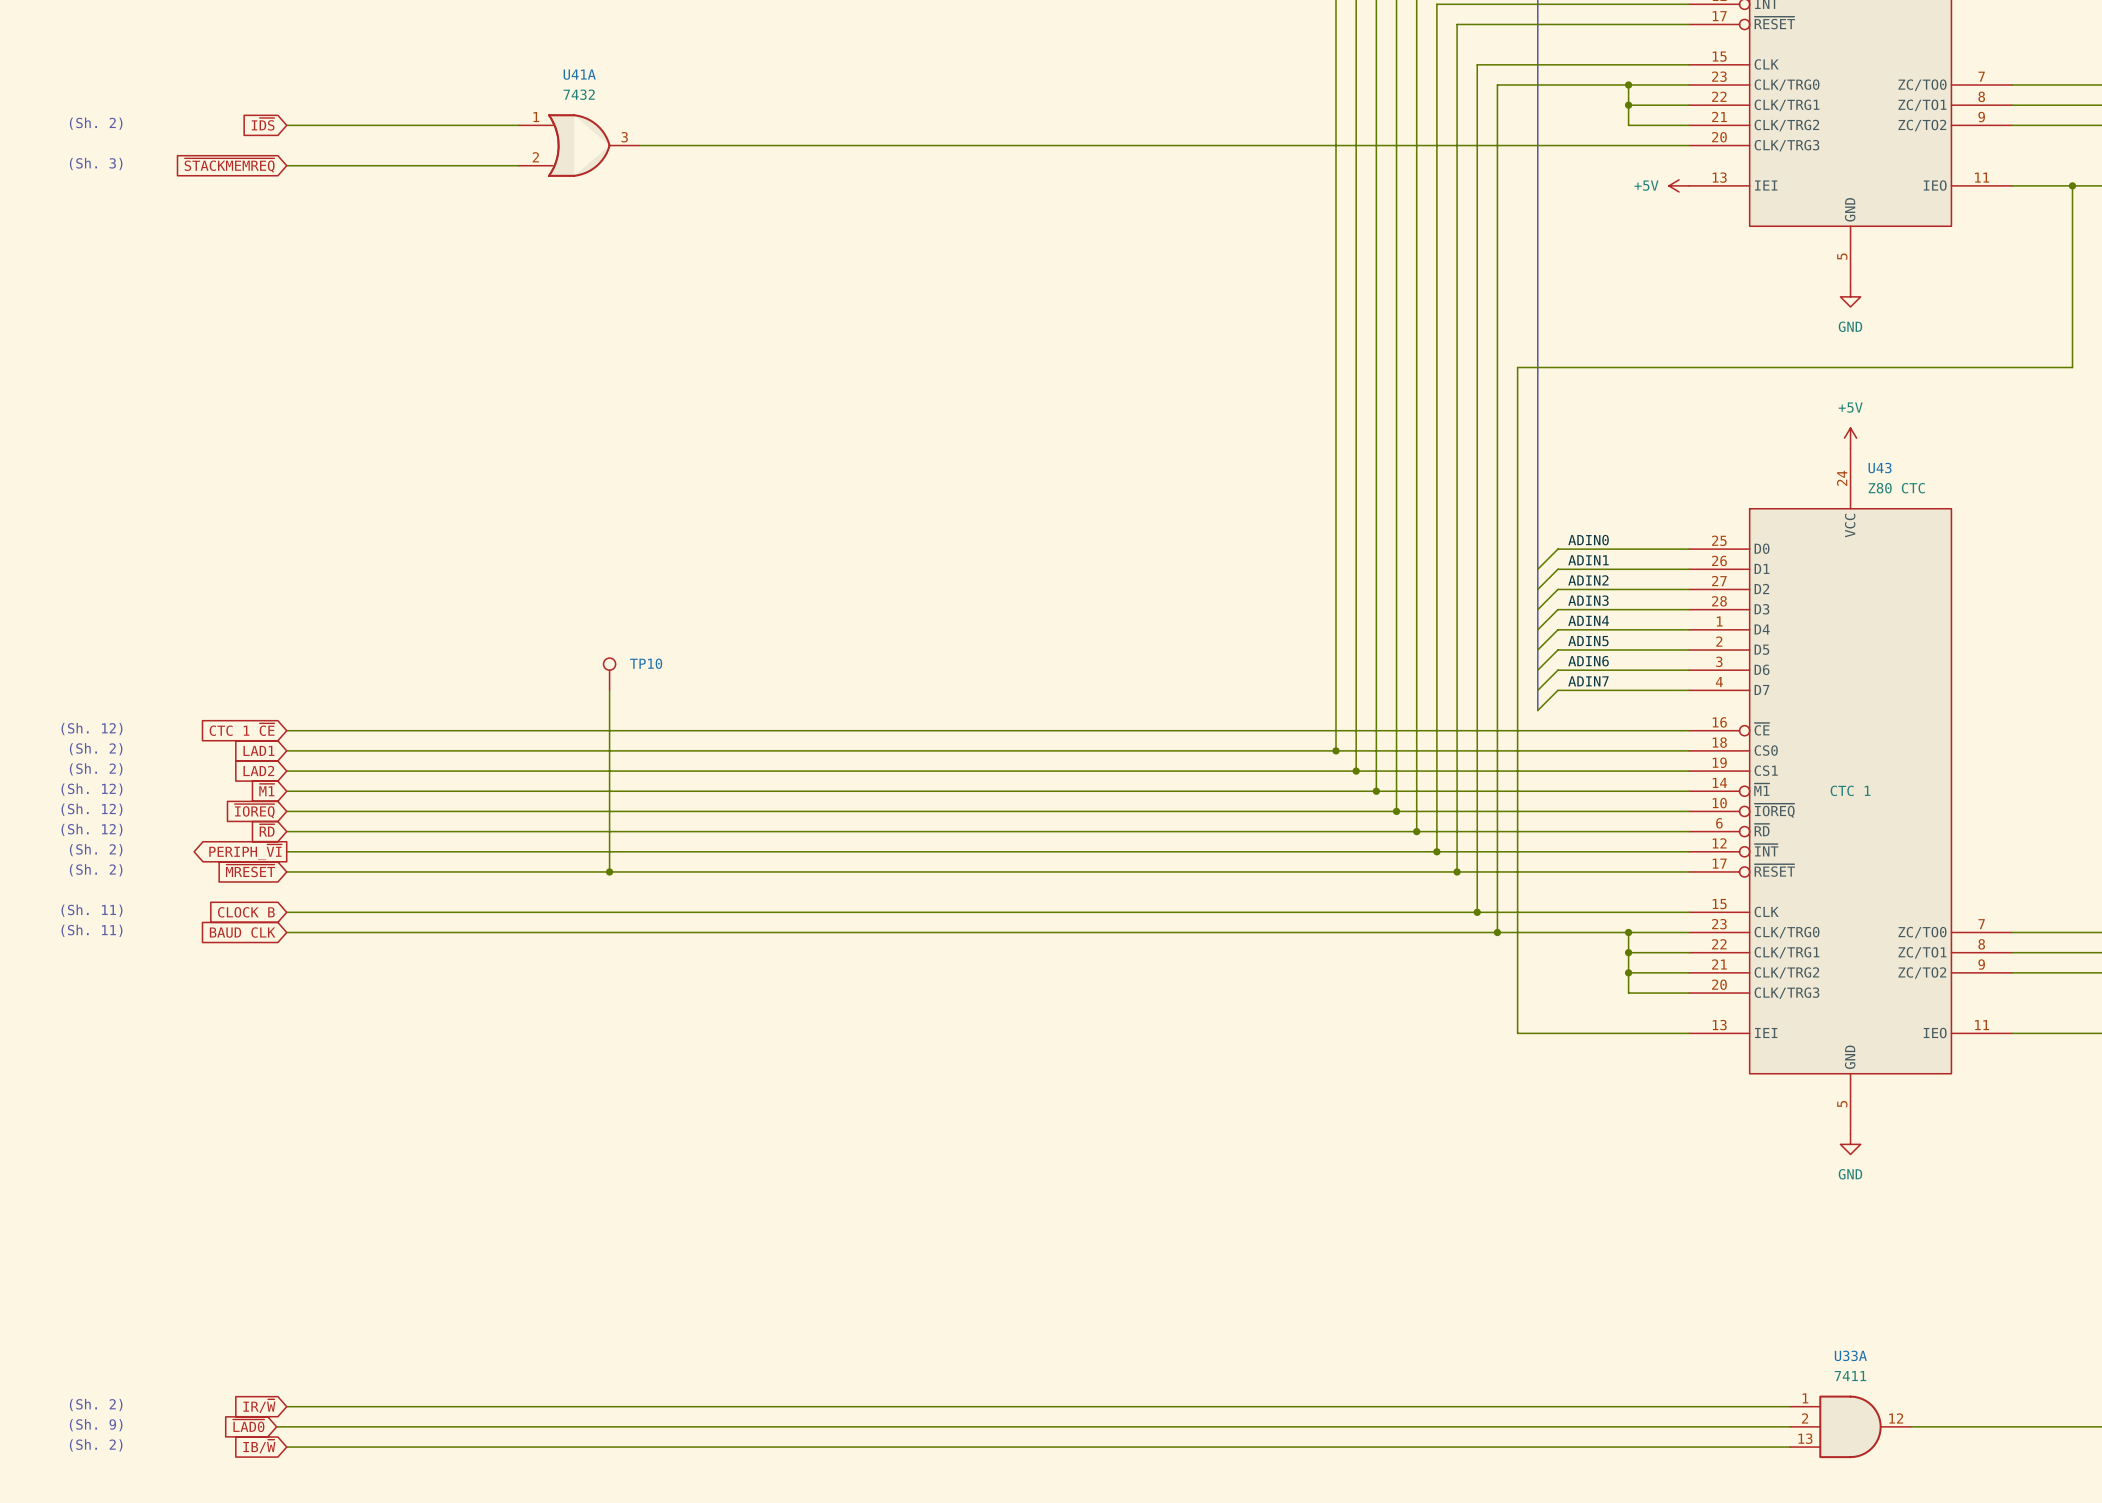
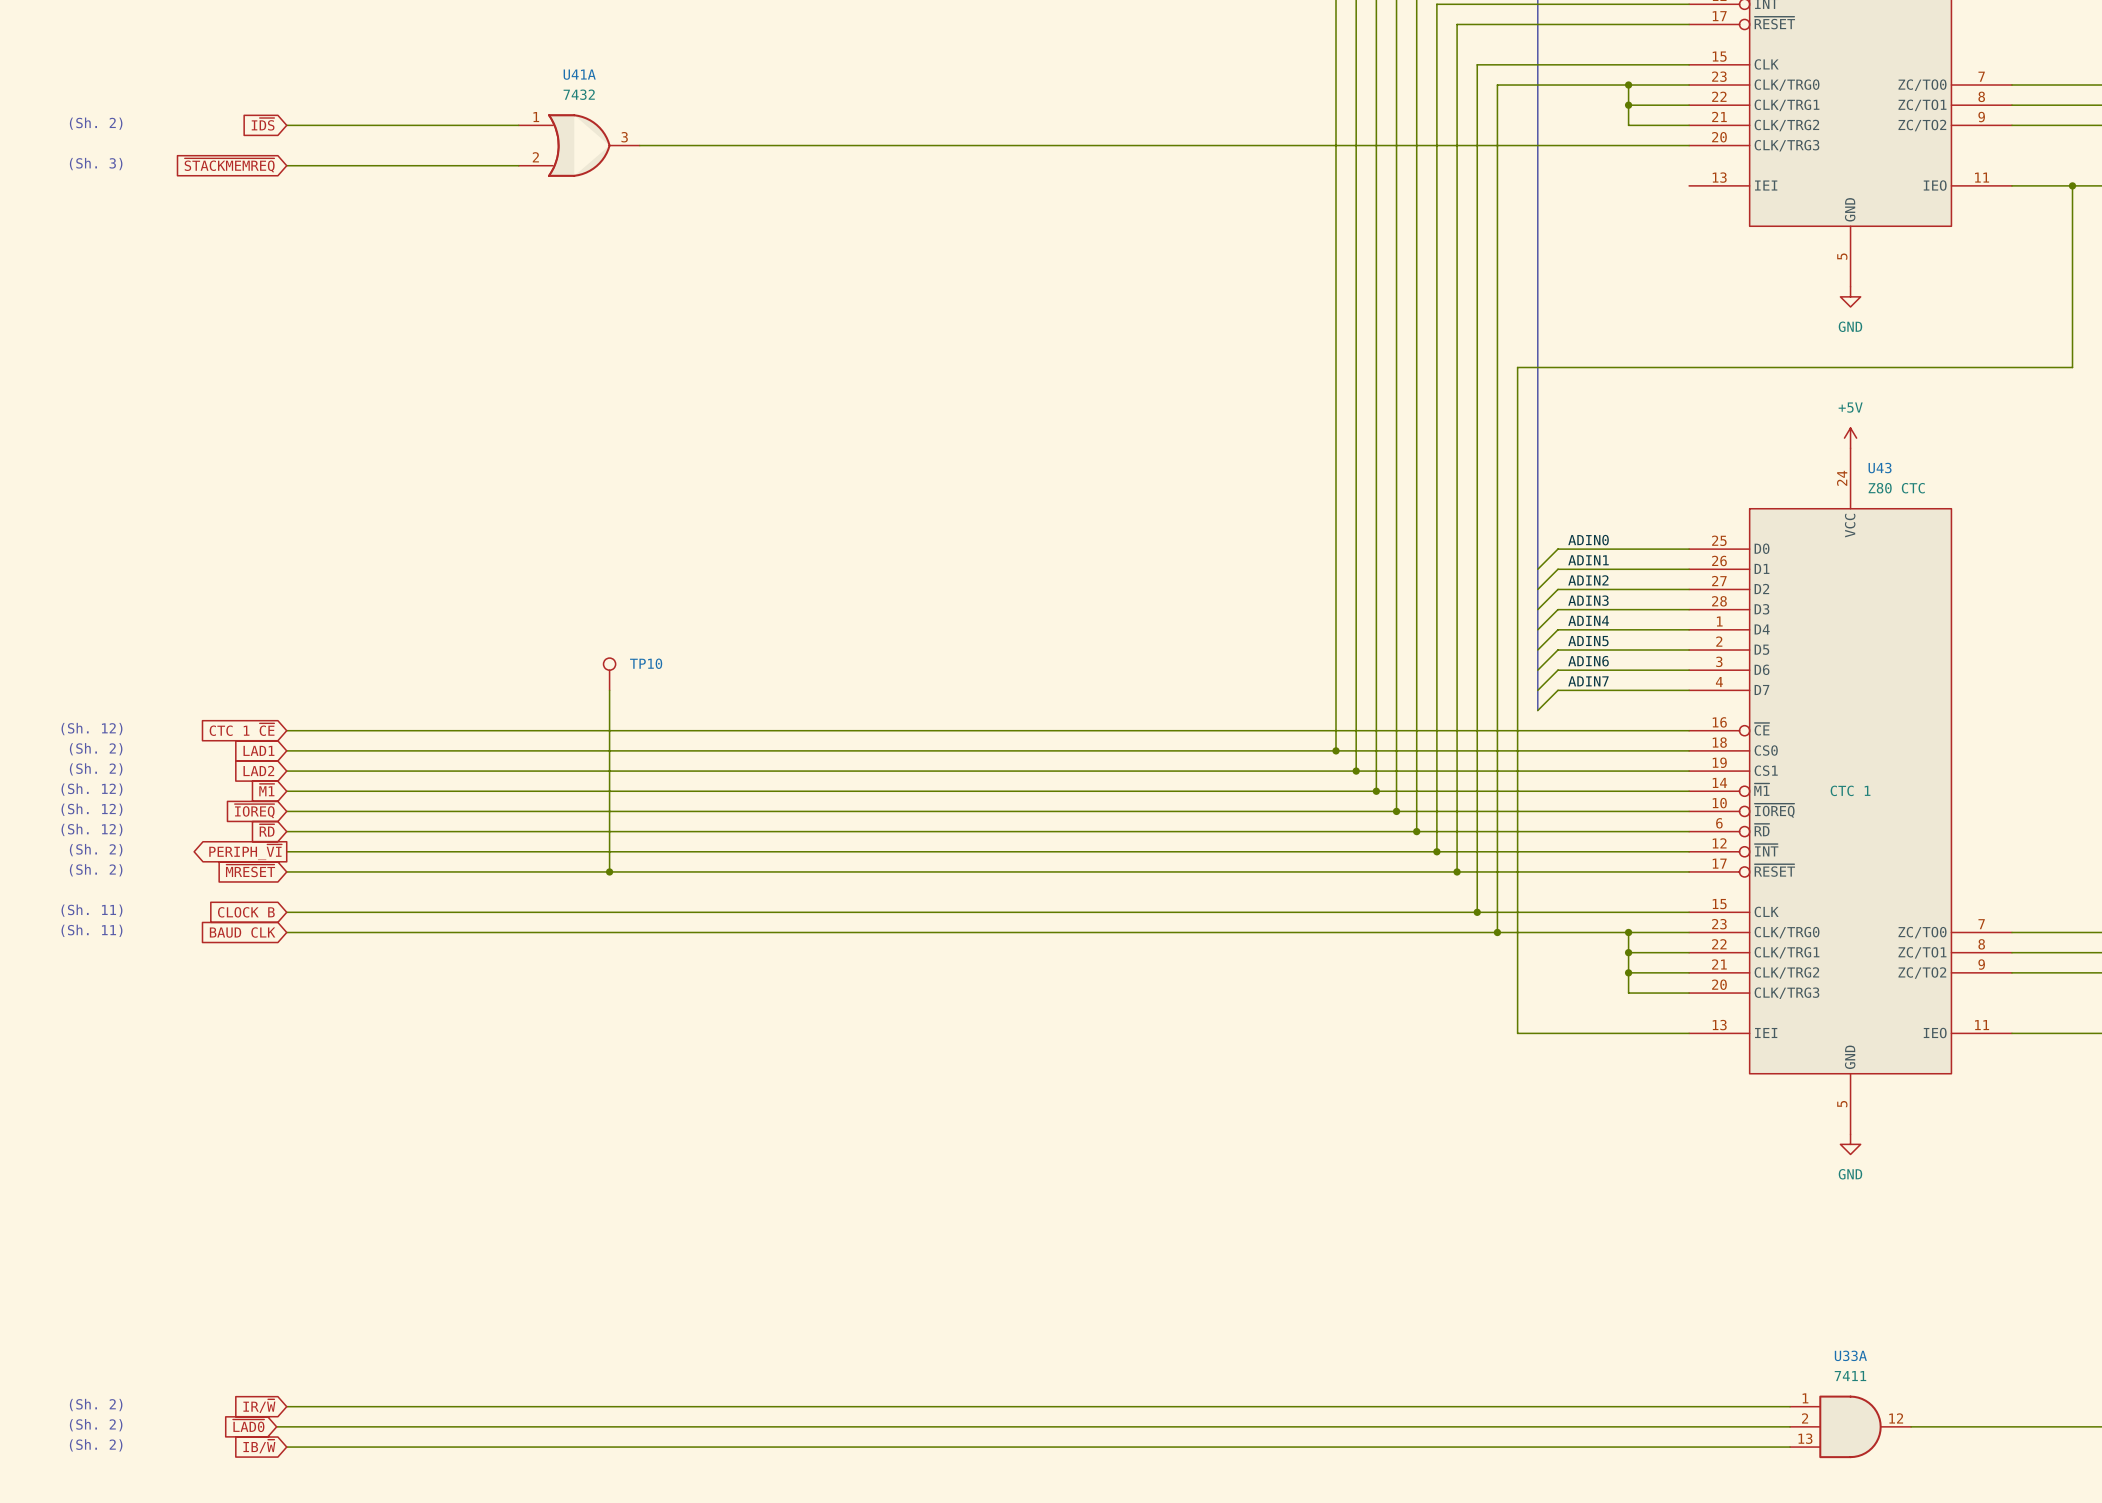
power symbol: +5V (1679, 185) -> none
text: (Sh. 9) (96, 1425) -> (Sh. 2) (96, 1425)

